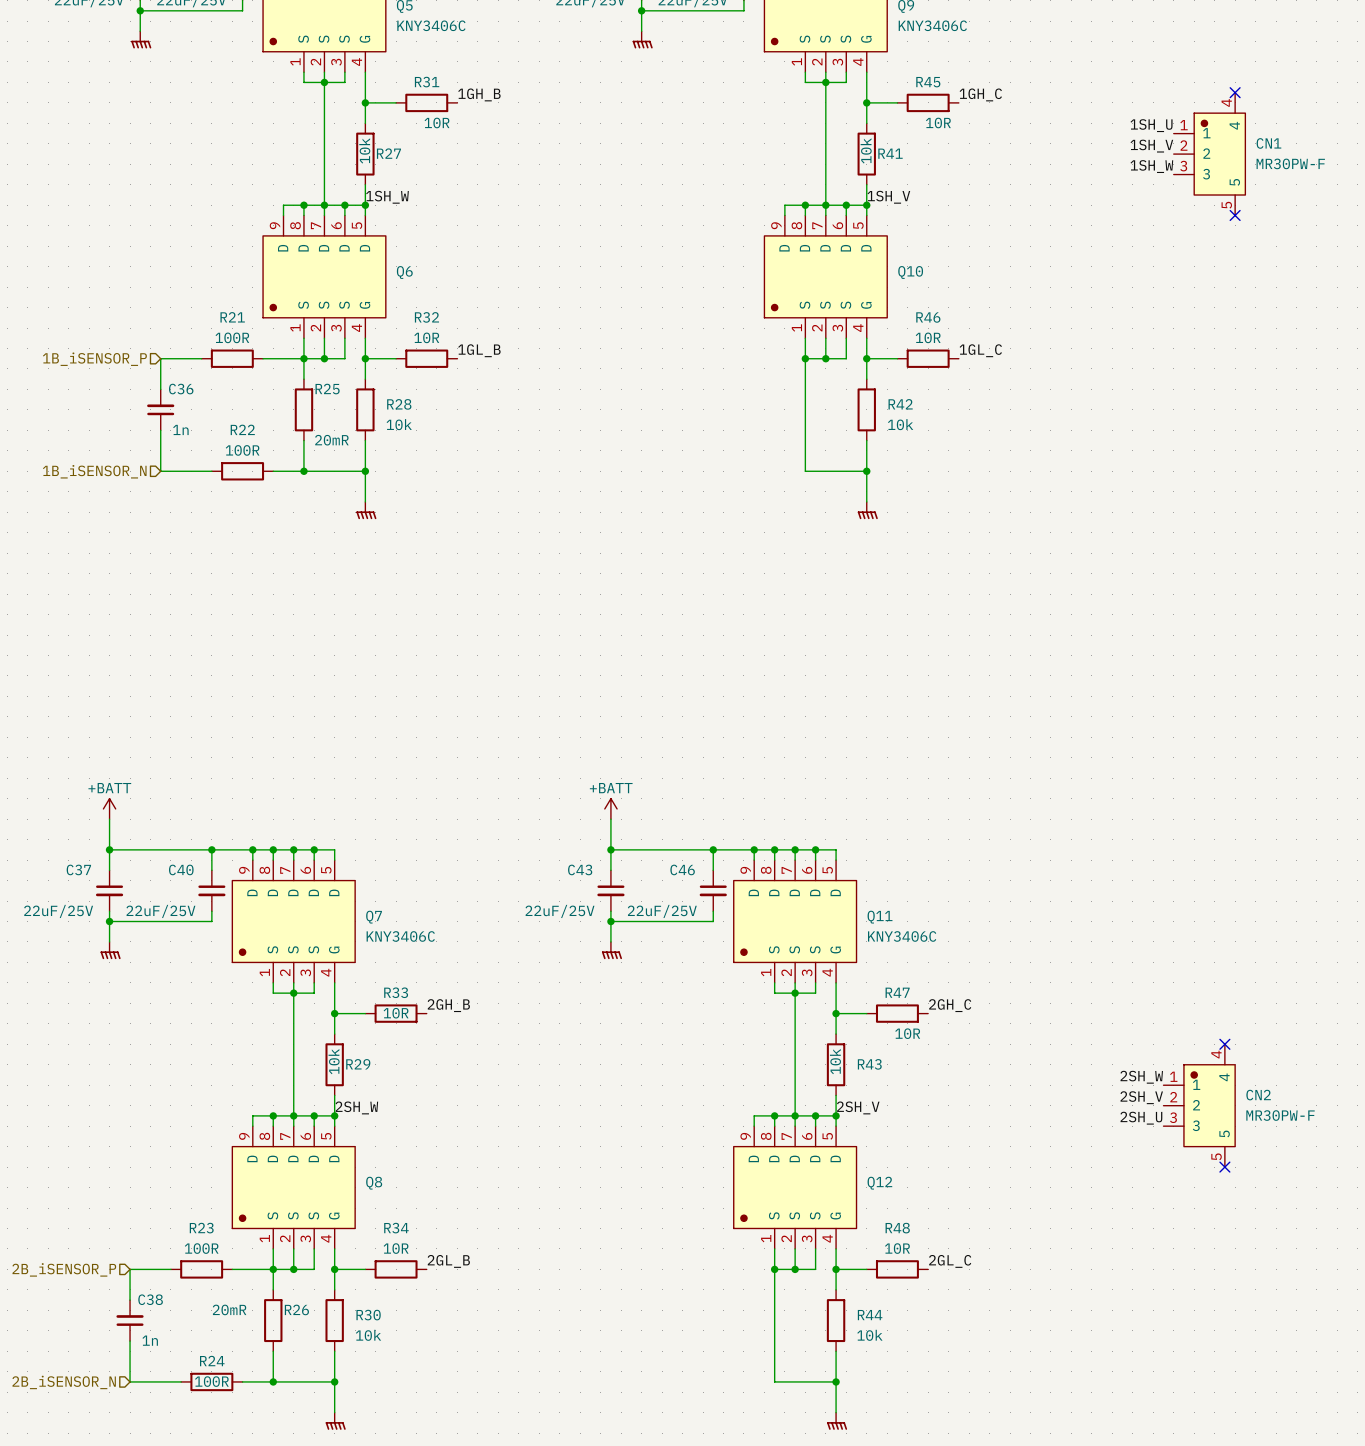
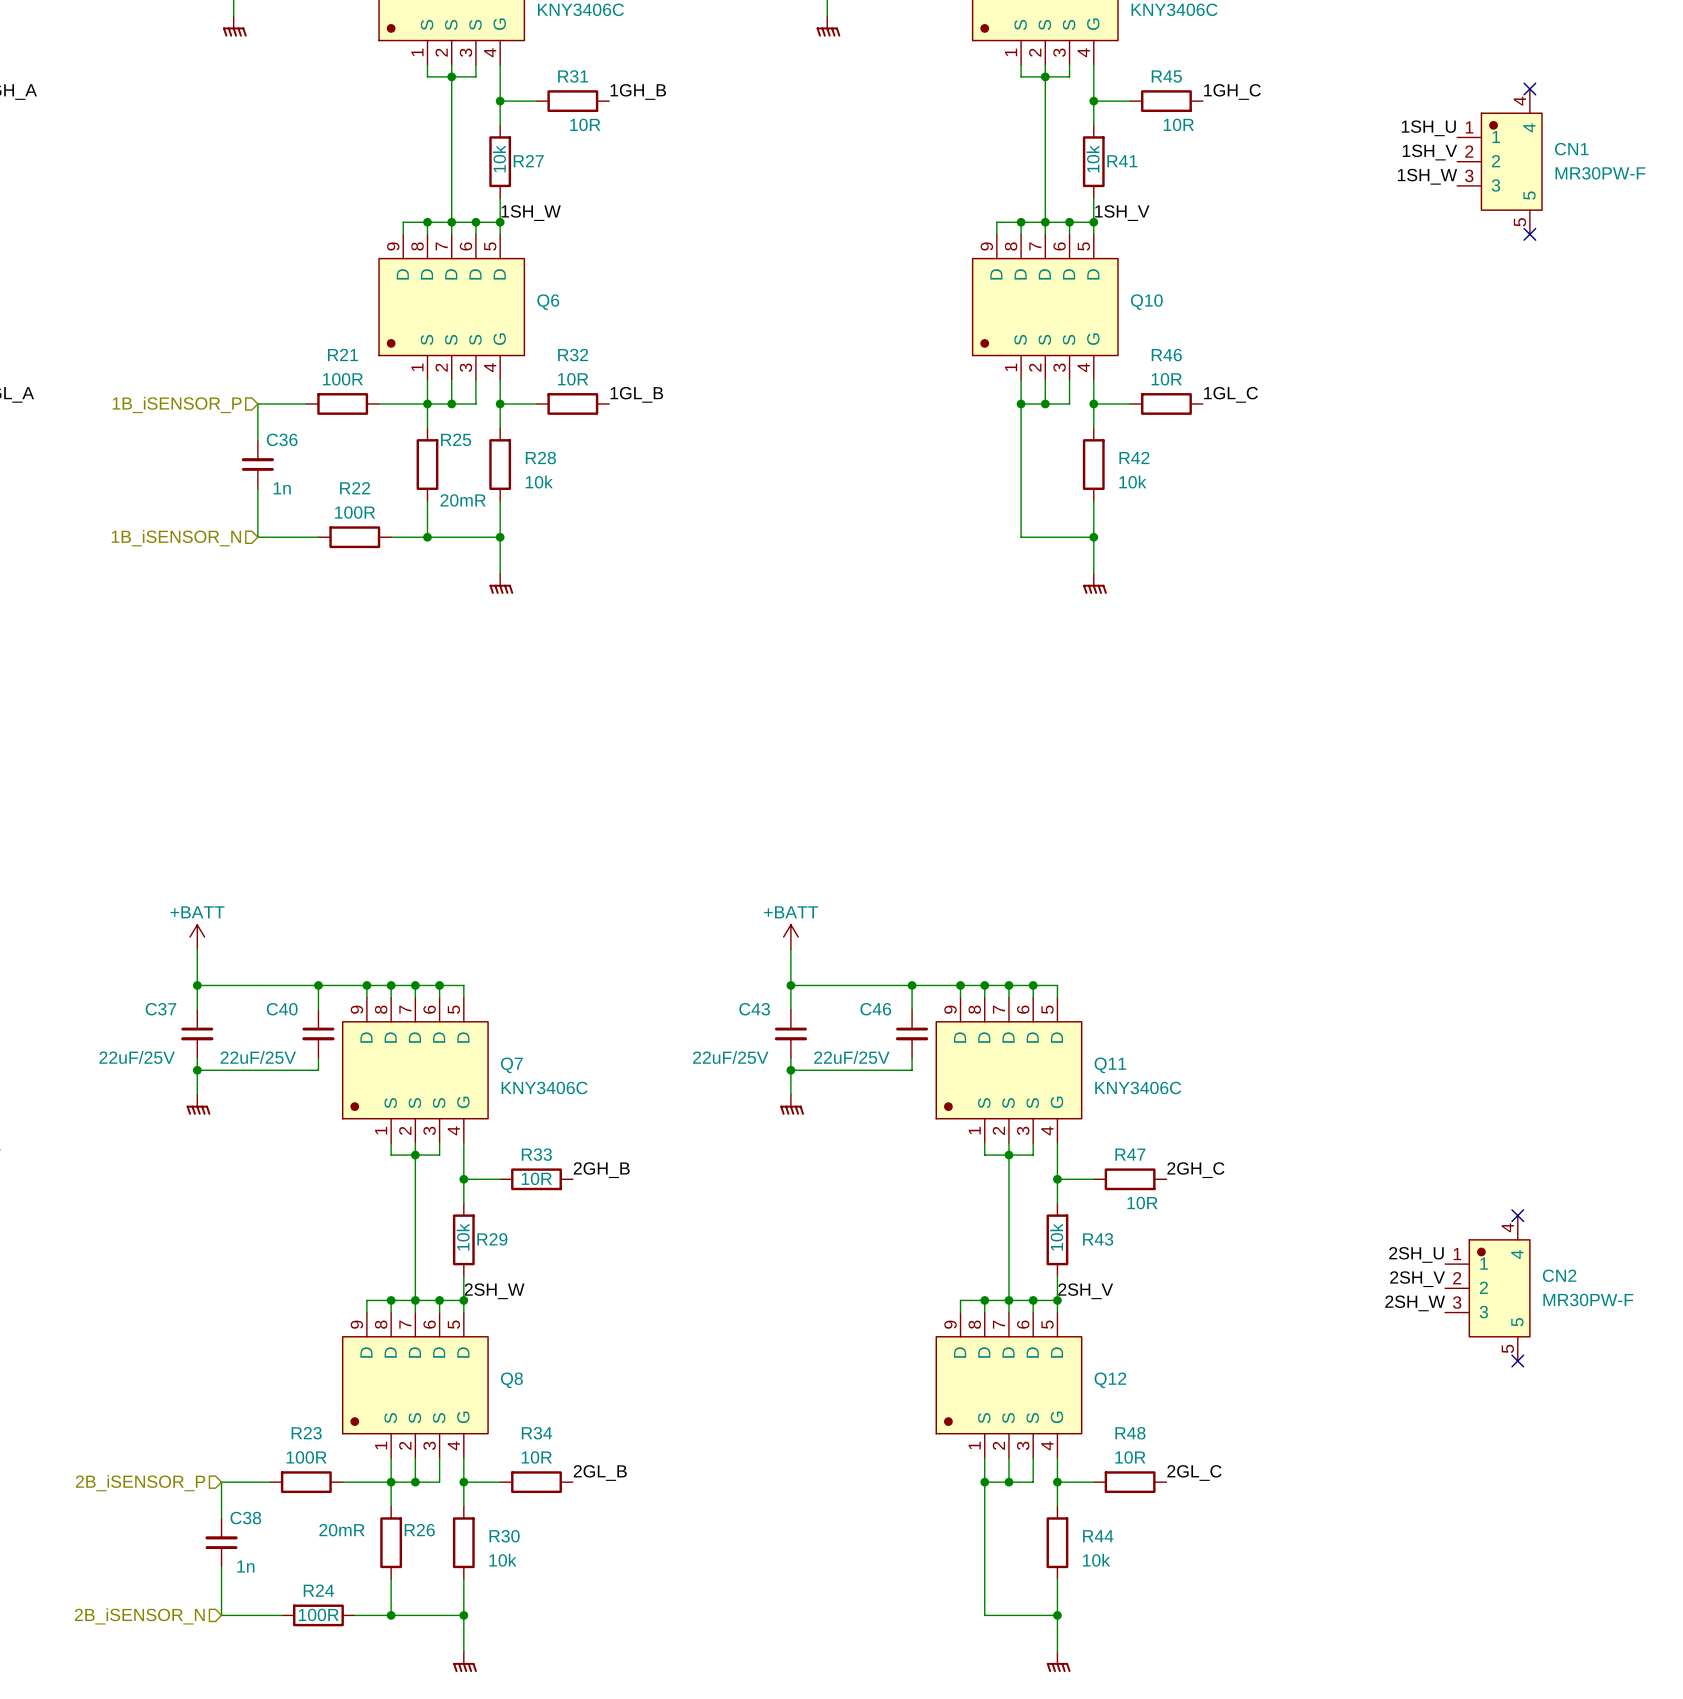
label: 2SH_W (1141, 1077) -> 2SH_U (1416, 1254)
label: 2SH_U (1141, 1118) -> 2SH_W (1415, 1303)

